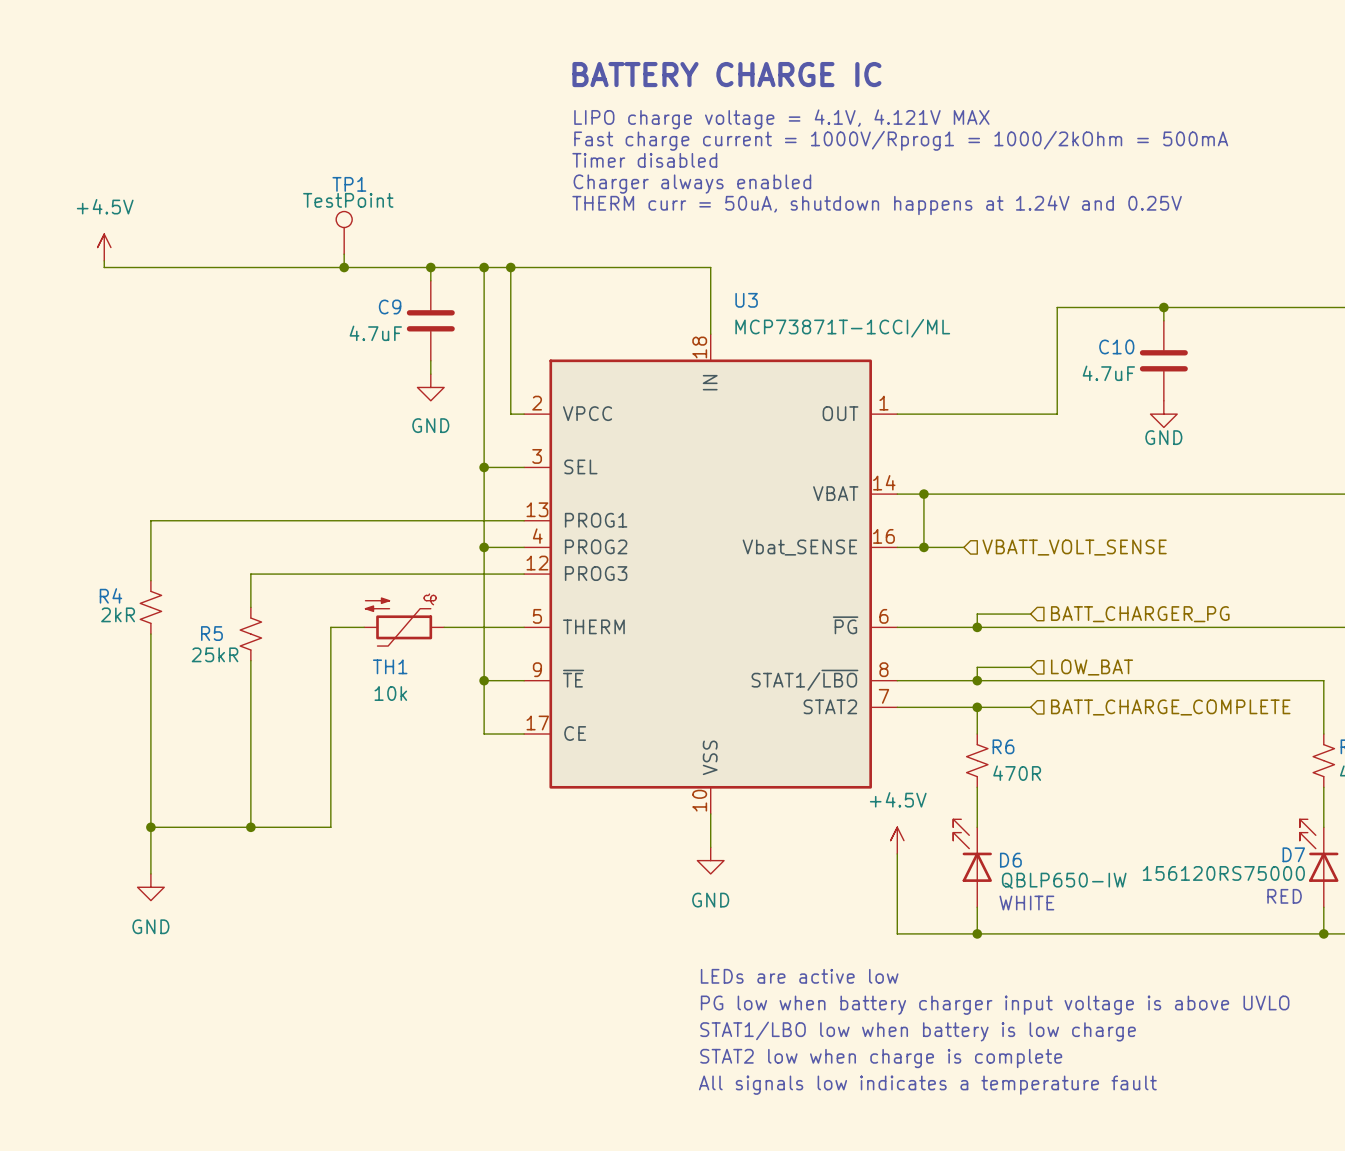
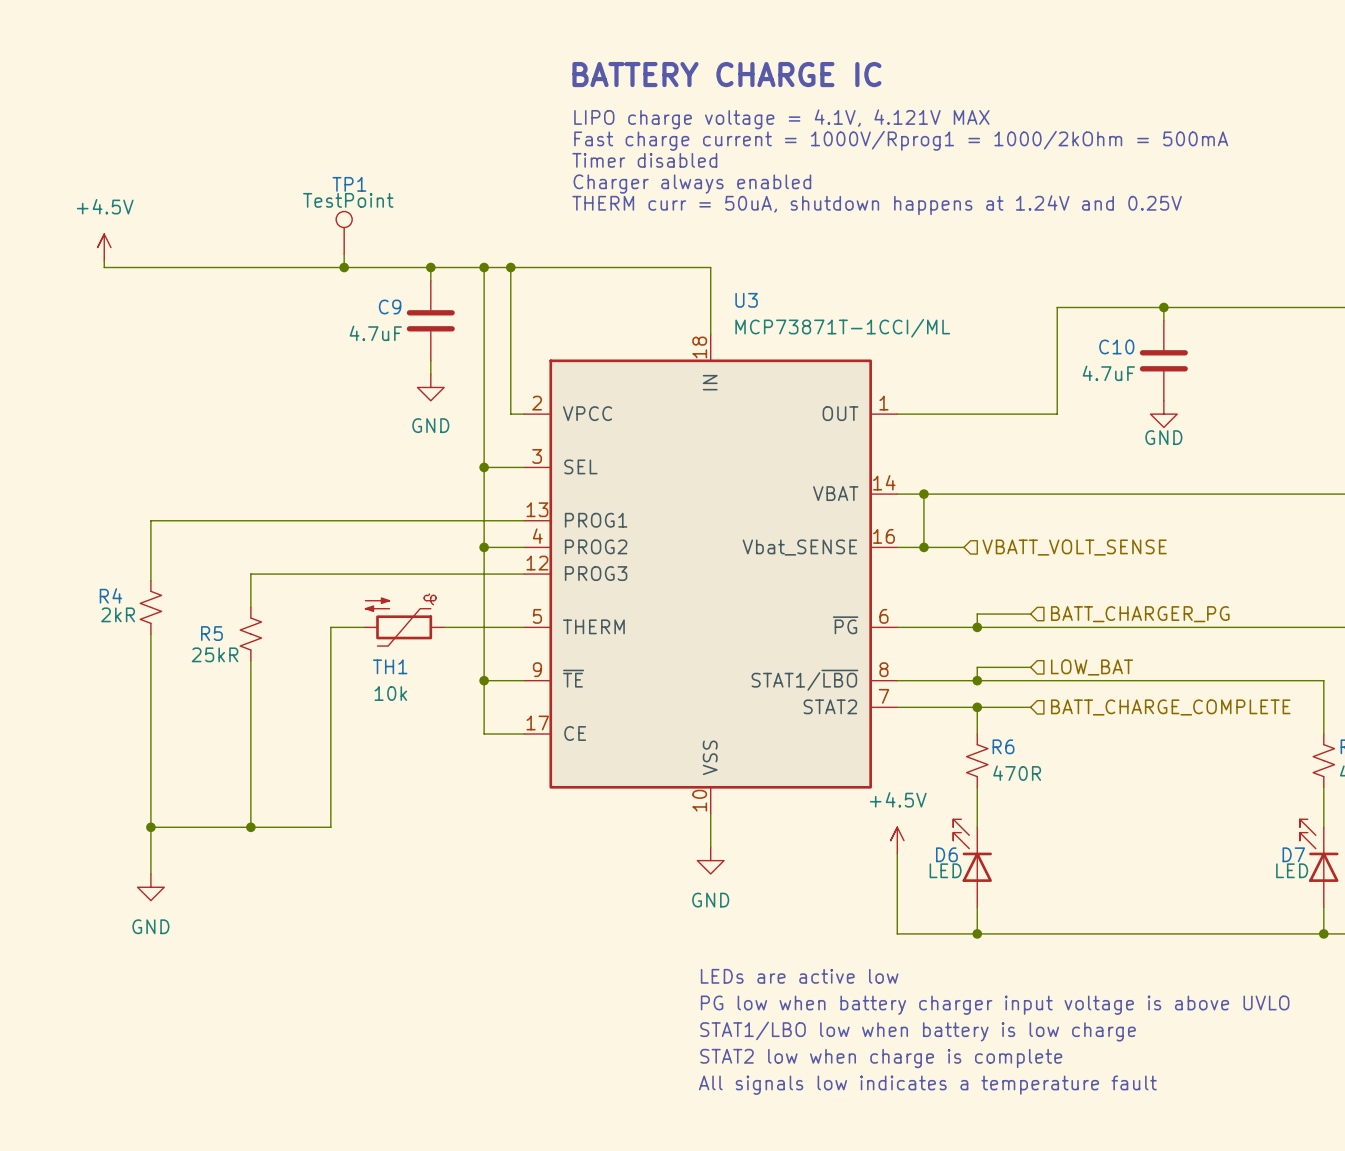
D6 name position: D6 (1010, 860) -> D6 (946, 854)
D7 value: 156120RS75000 (1223, 873) -> LED (1292, 870)
D6 value: QBLP650-IW (1064, 880) -> LED (945, 870)
text: RED (1284, 896) -> none
text: WHITE (1026, 903) -> none

